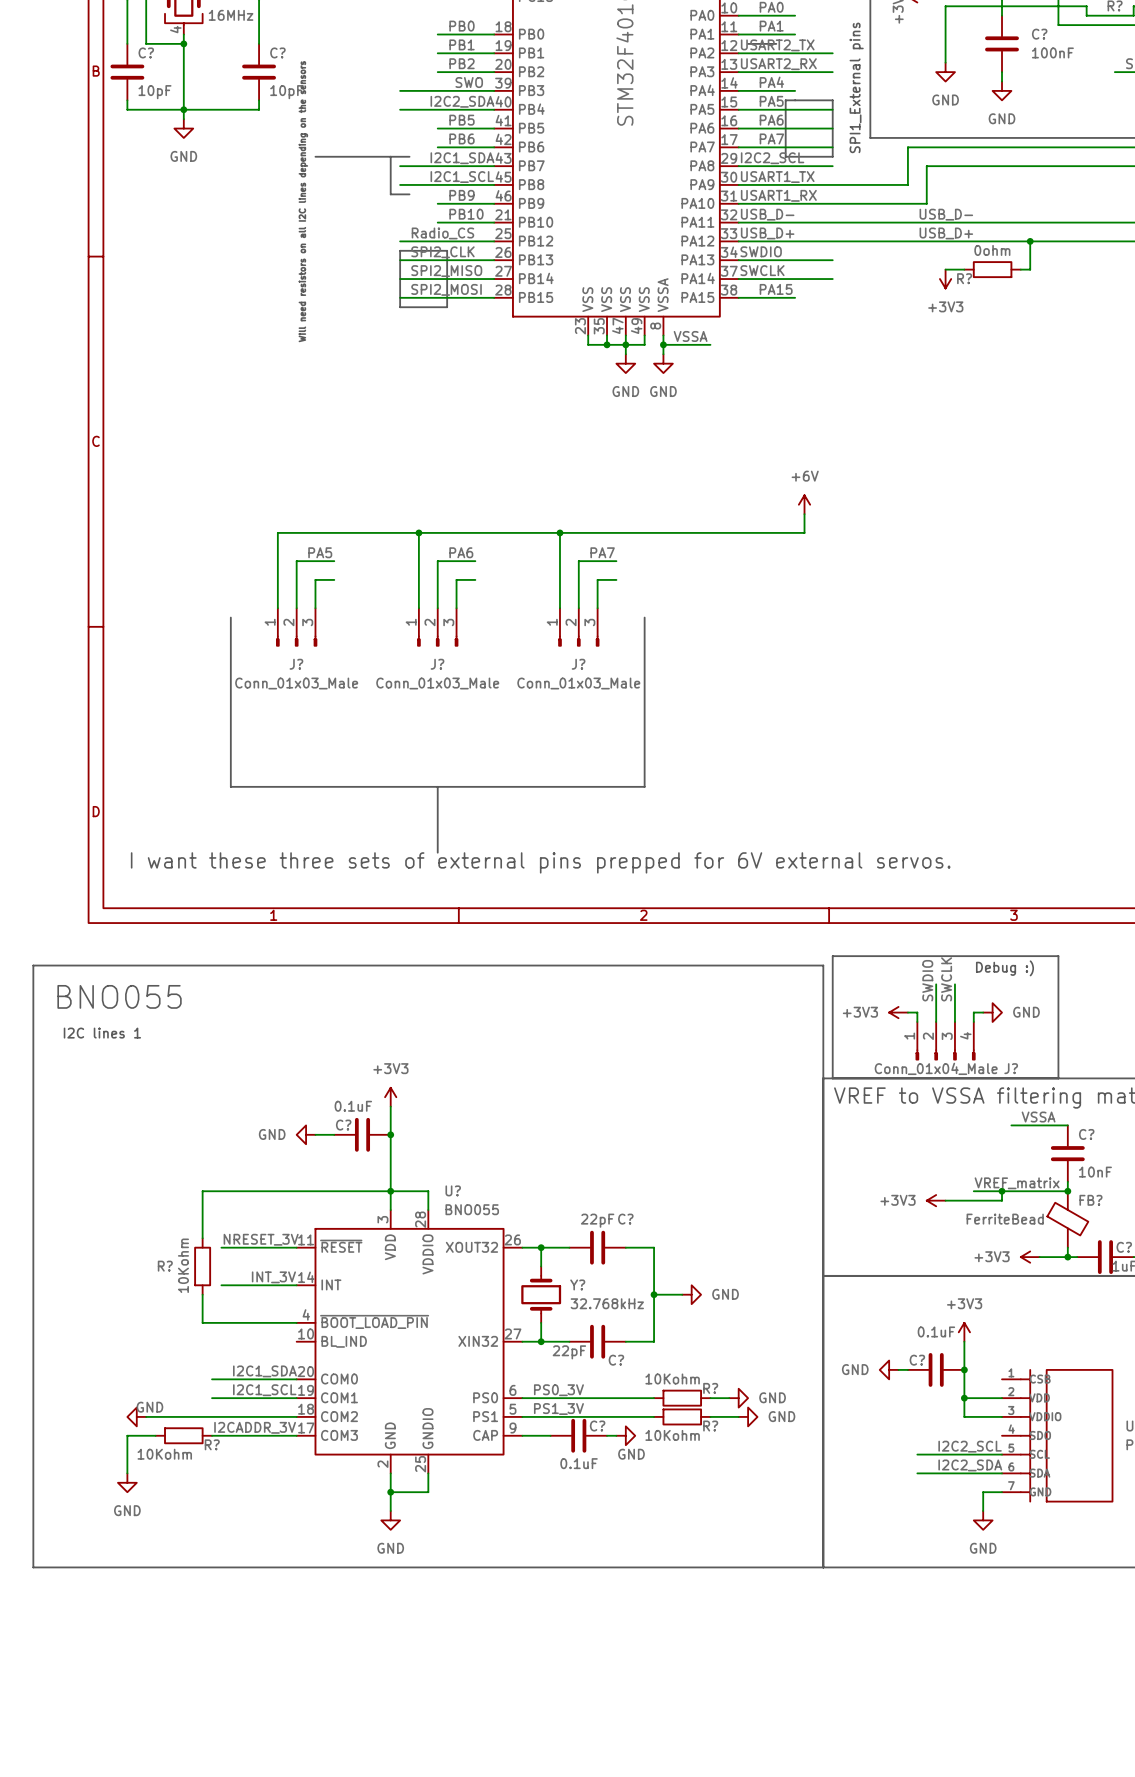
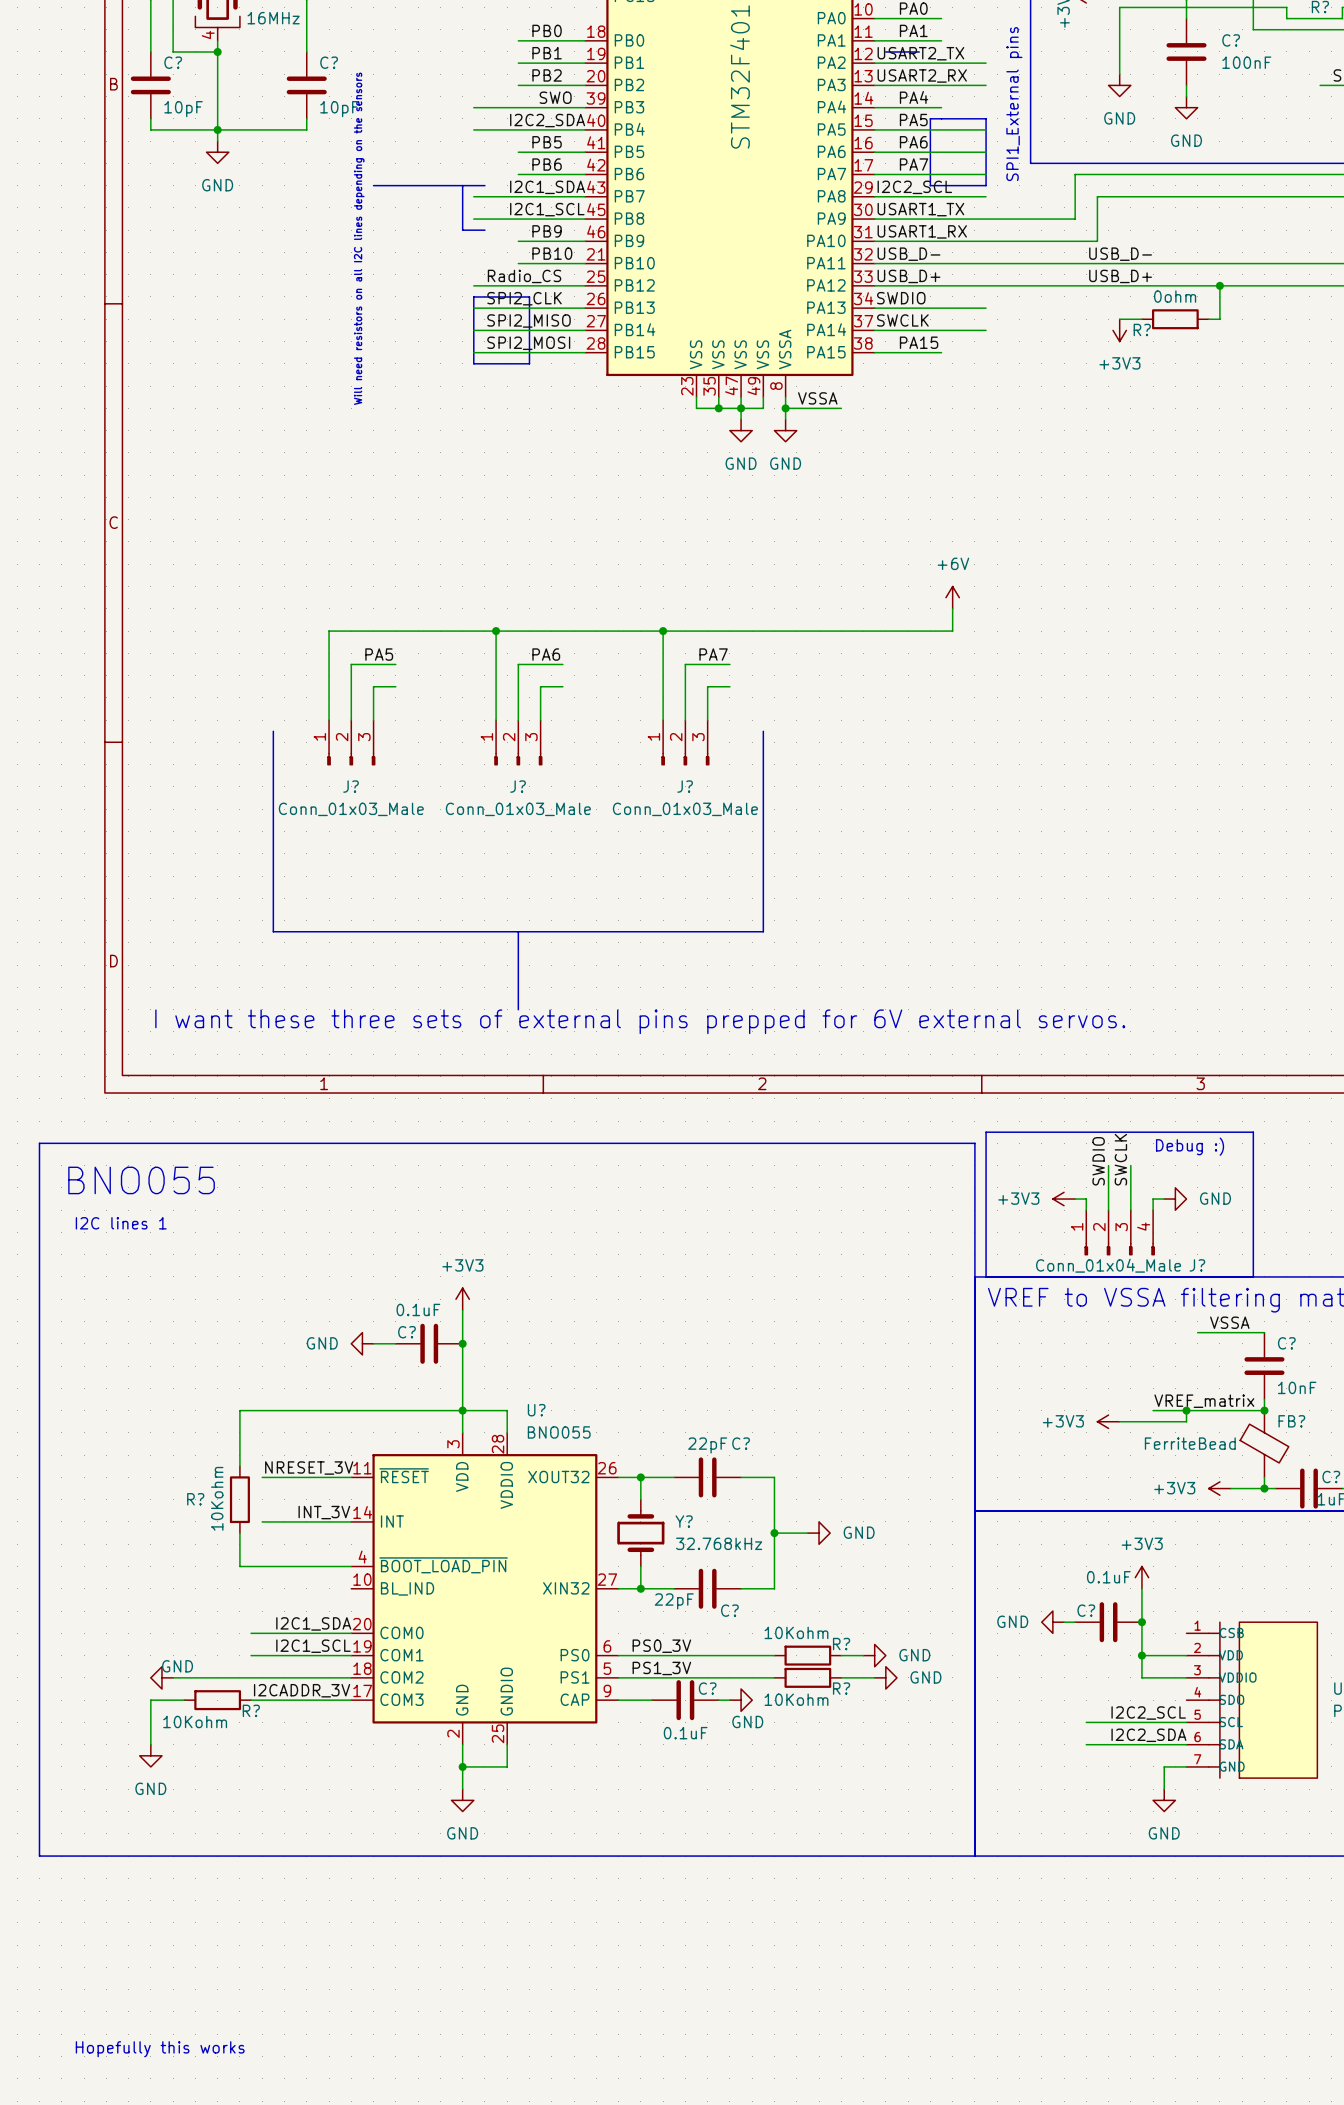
text: none -> Hopefully this works (160, 2049)

